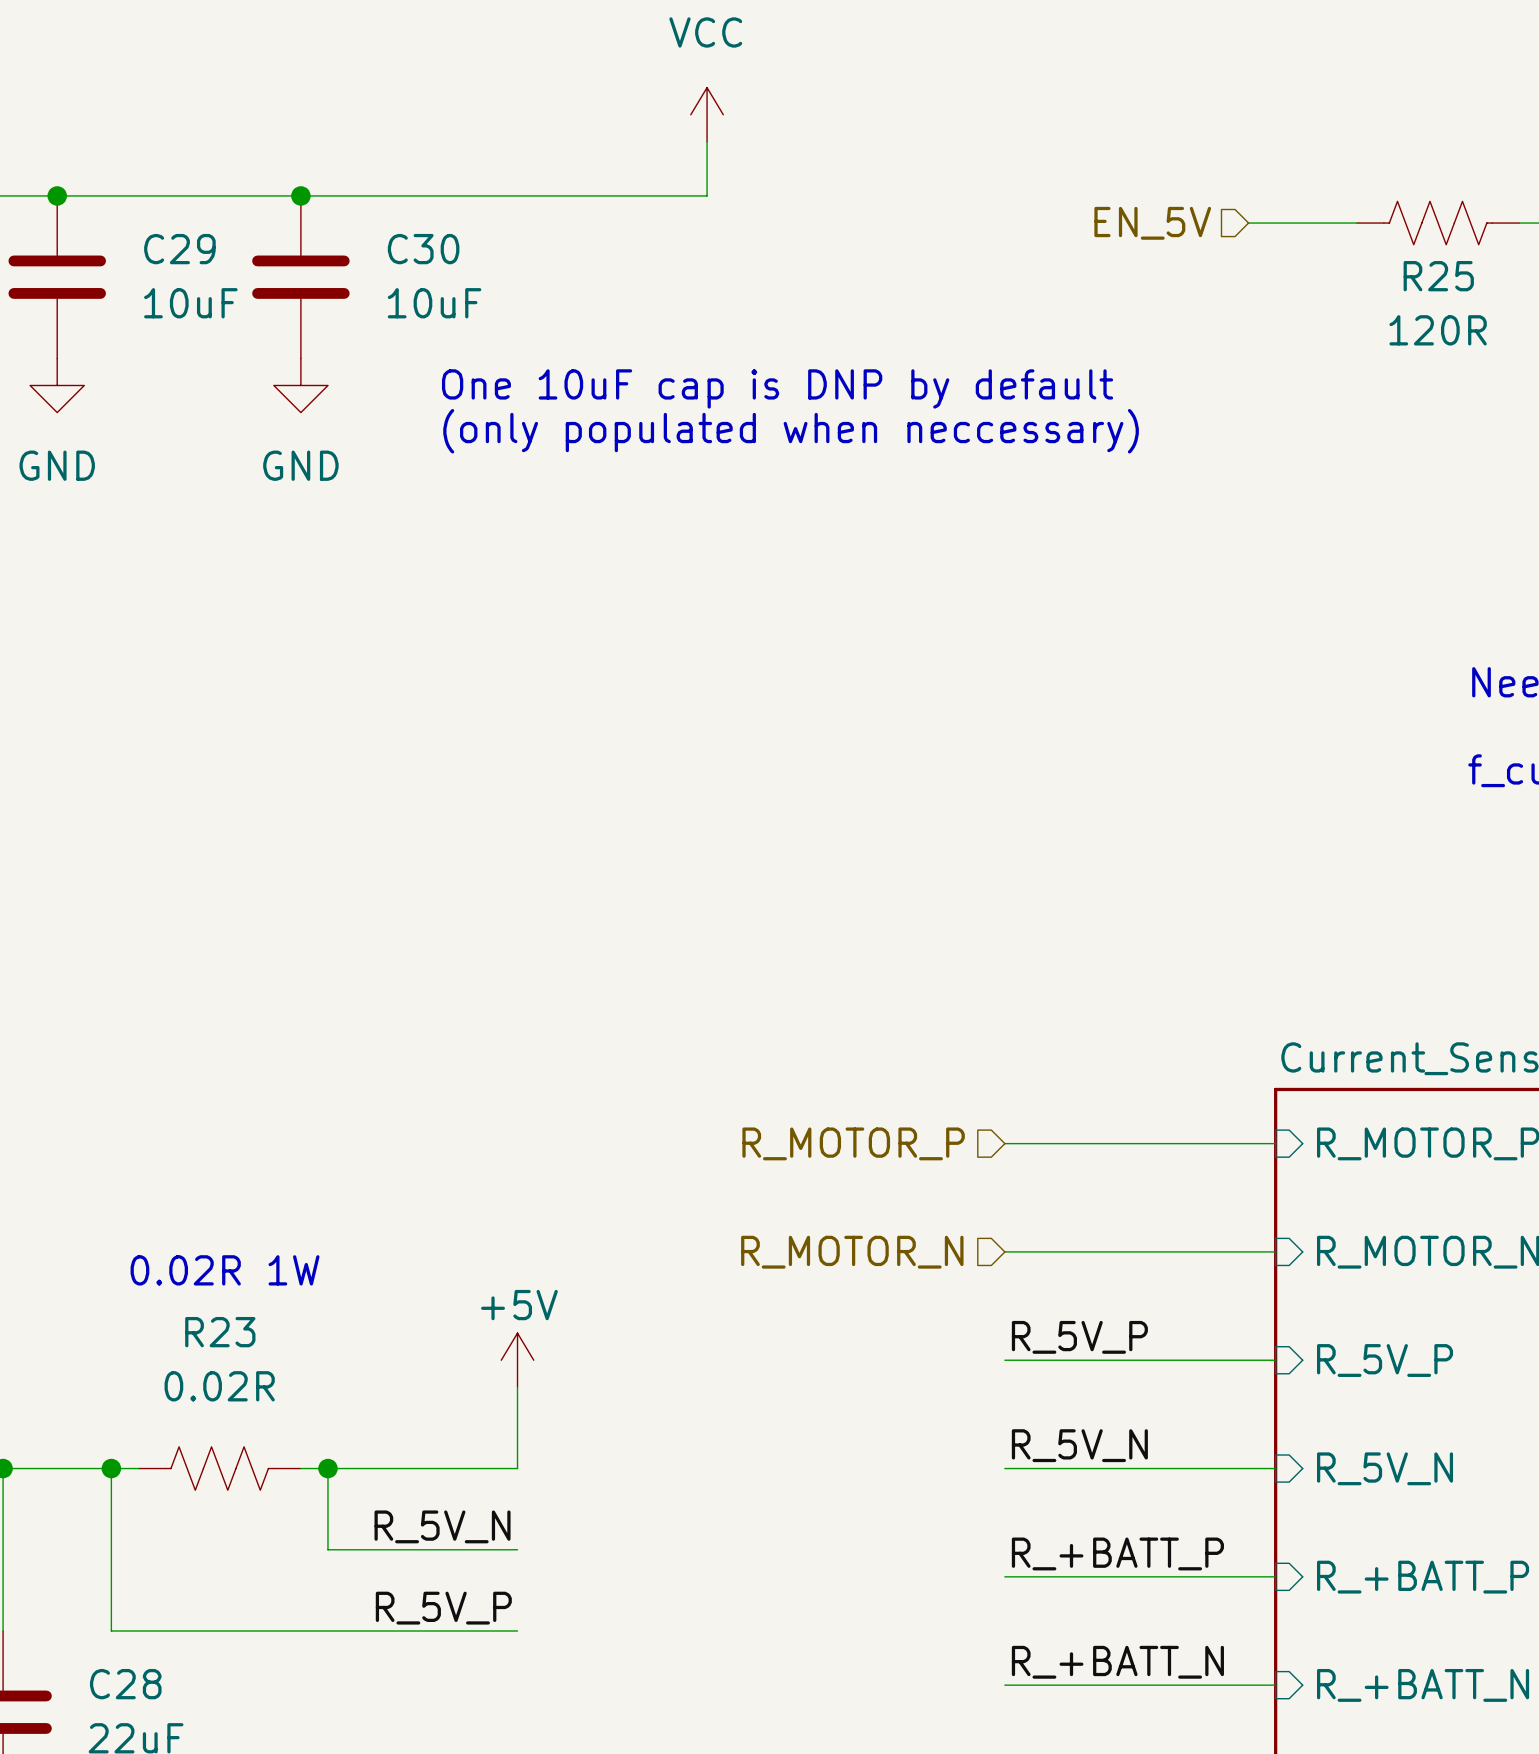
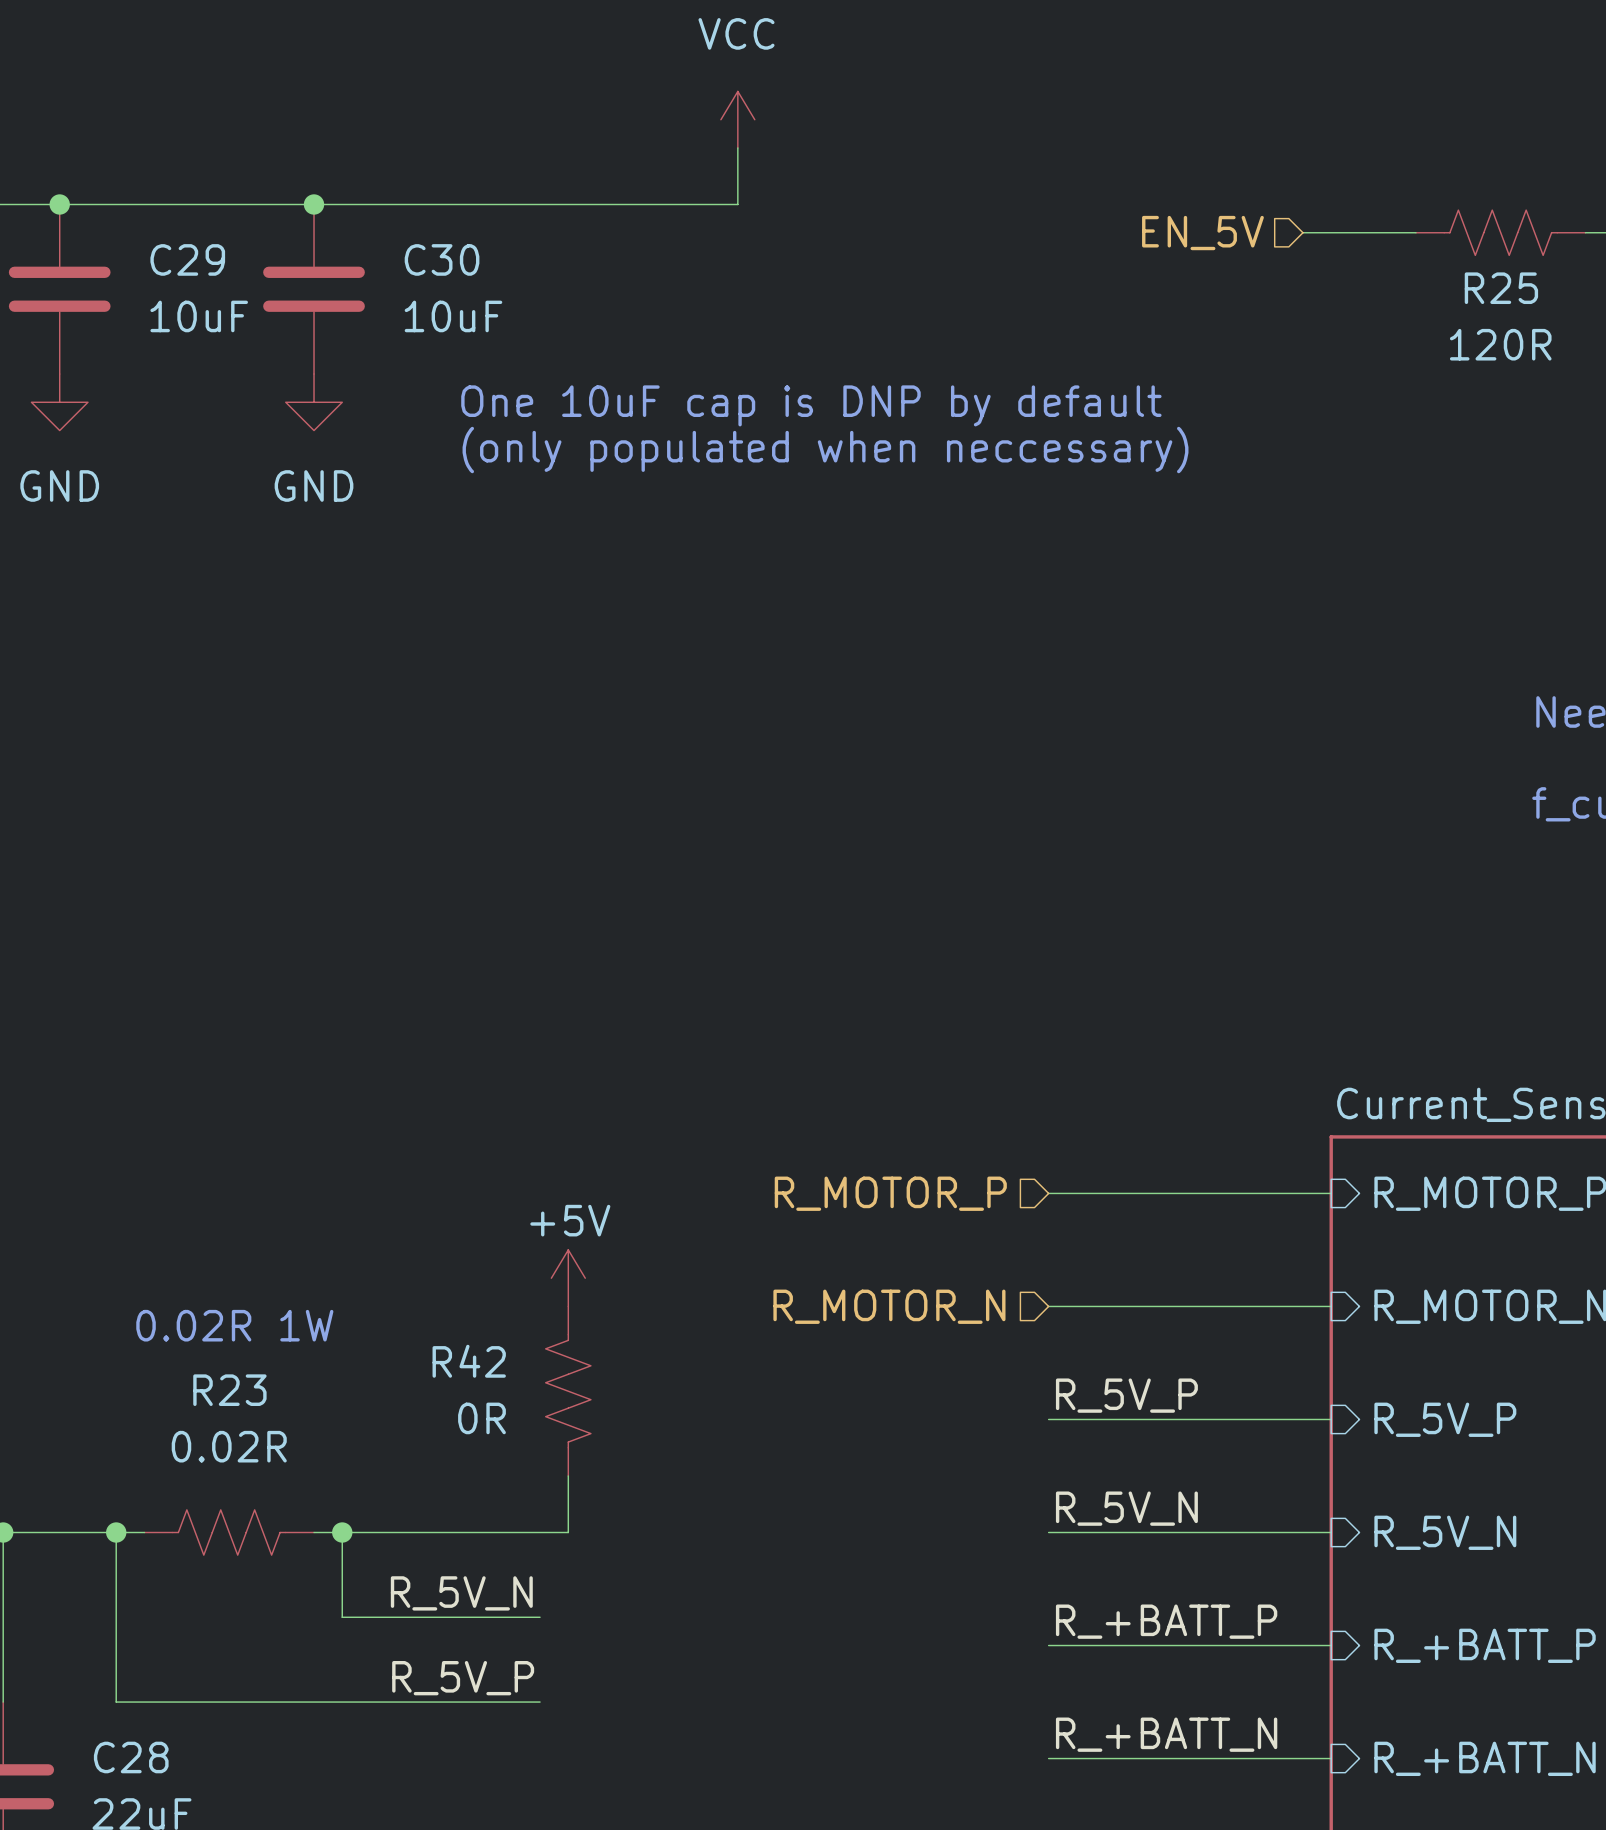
R42: none -> 0R (568, 1391)
power symbol position: +5V (517, 1360) -> +5V (568, 1278)
wire: (517, 1387) (517, 1468) -> (568, 1475) (568, 1532) (540, 1532)

